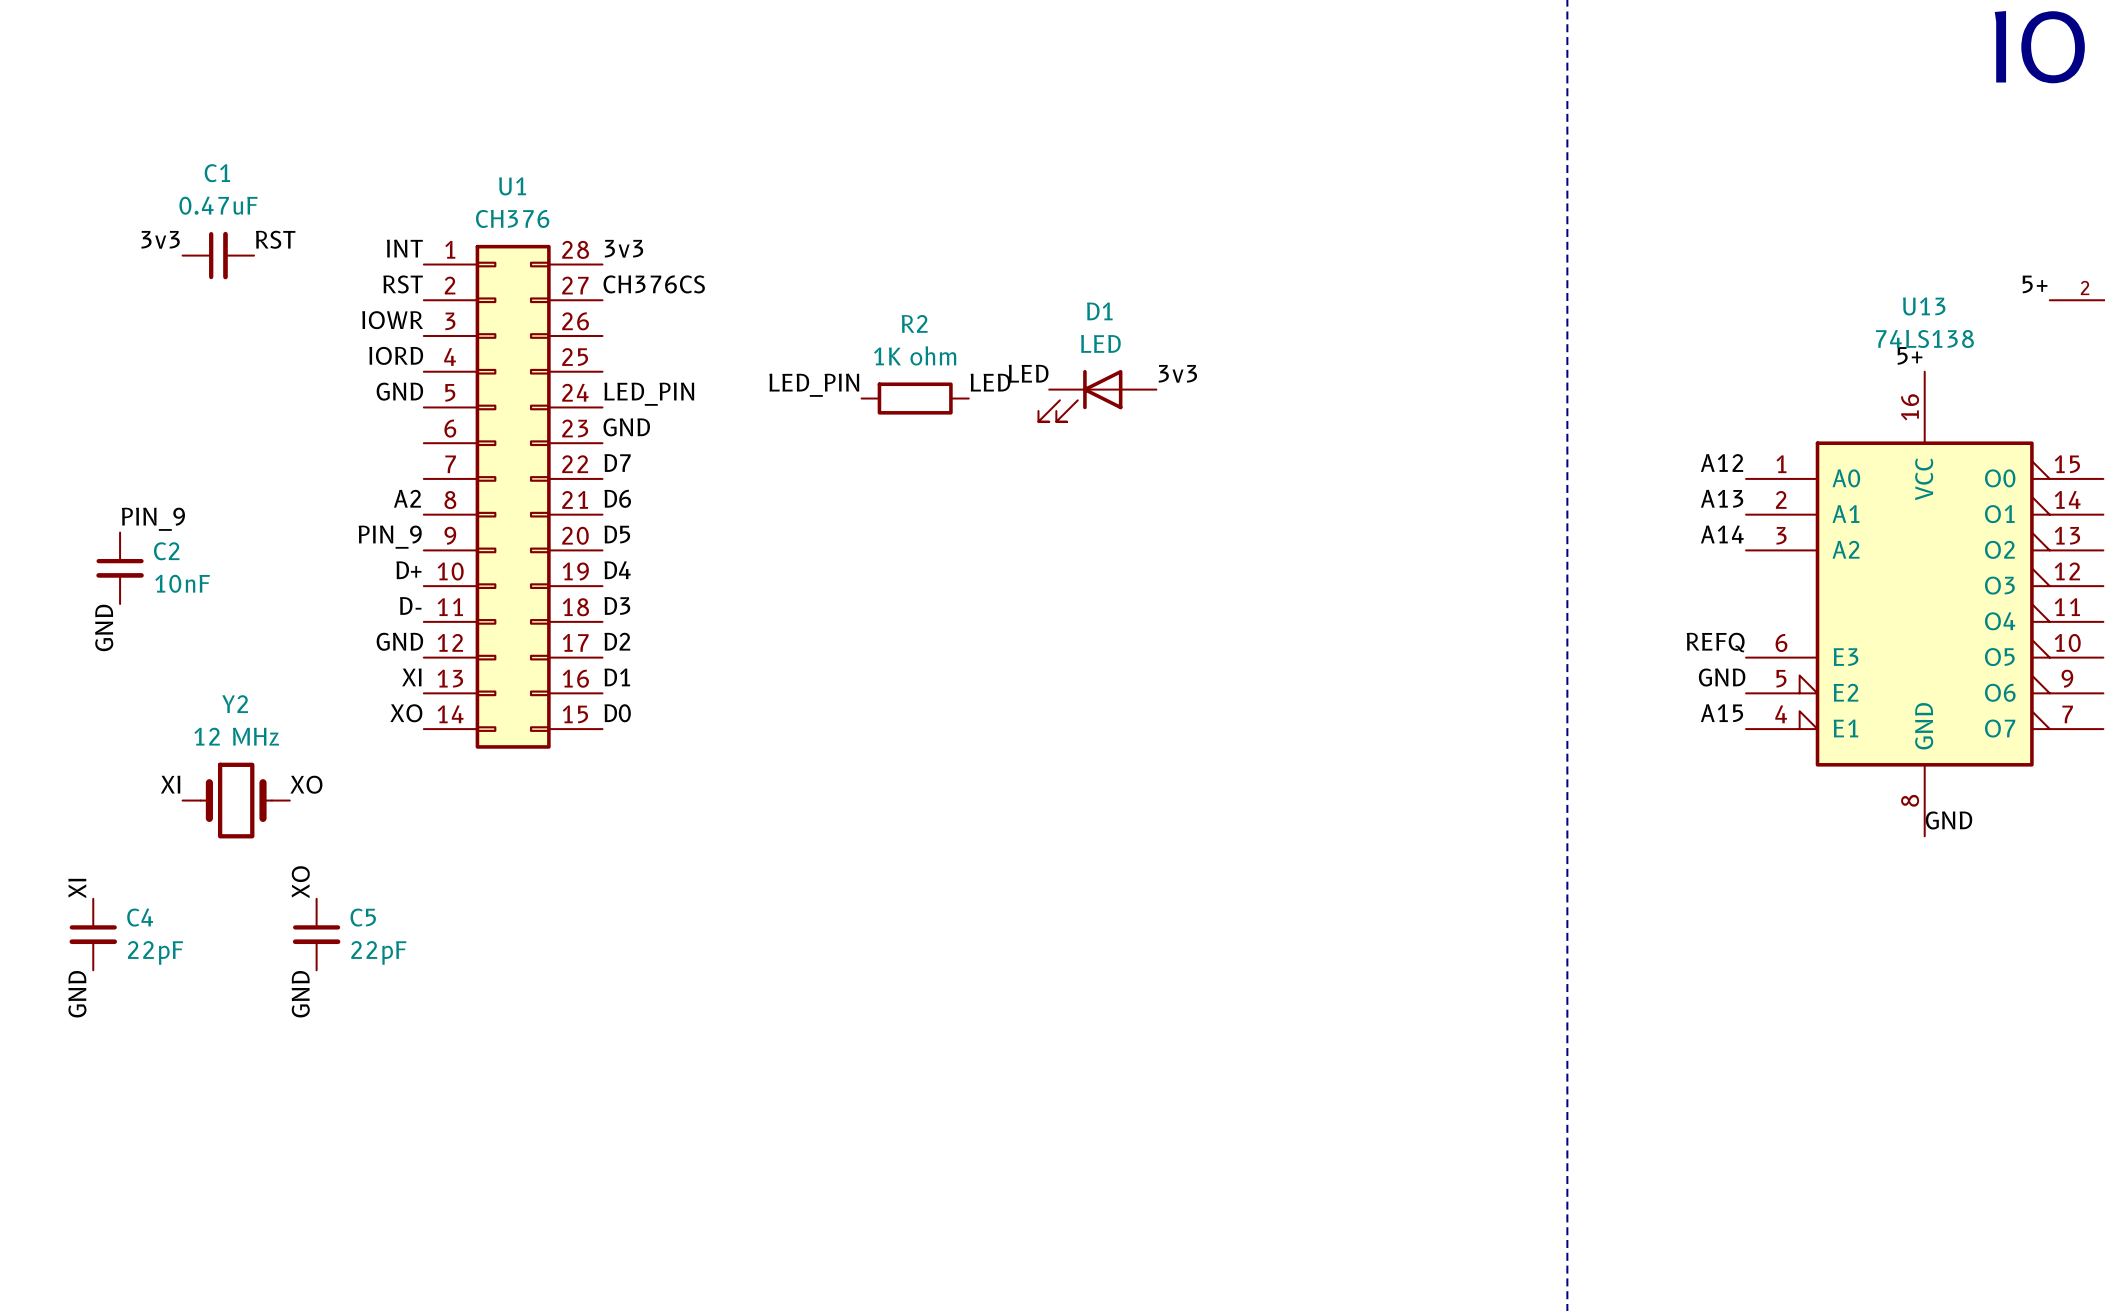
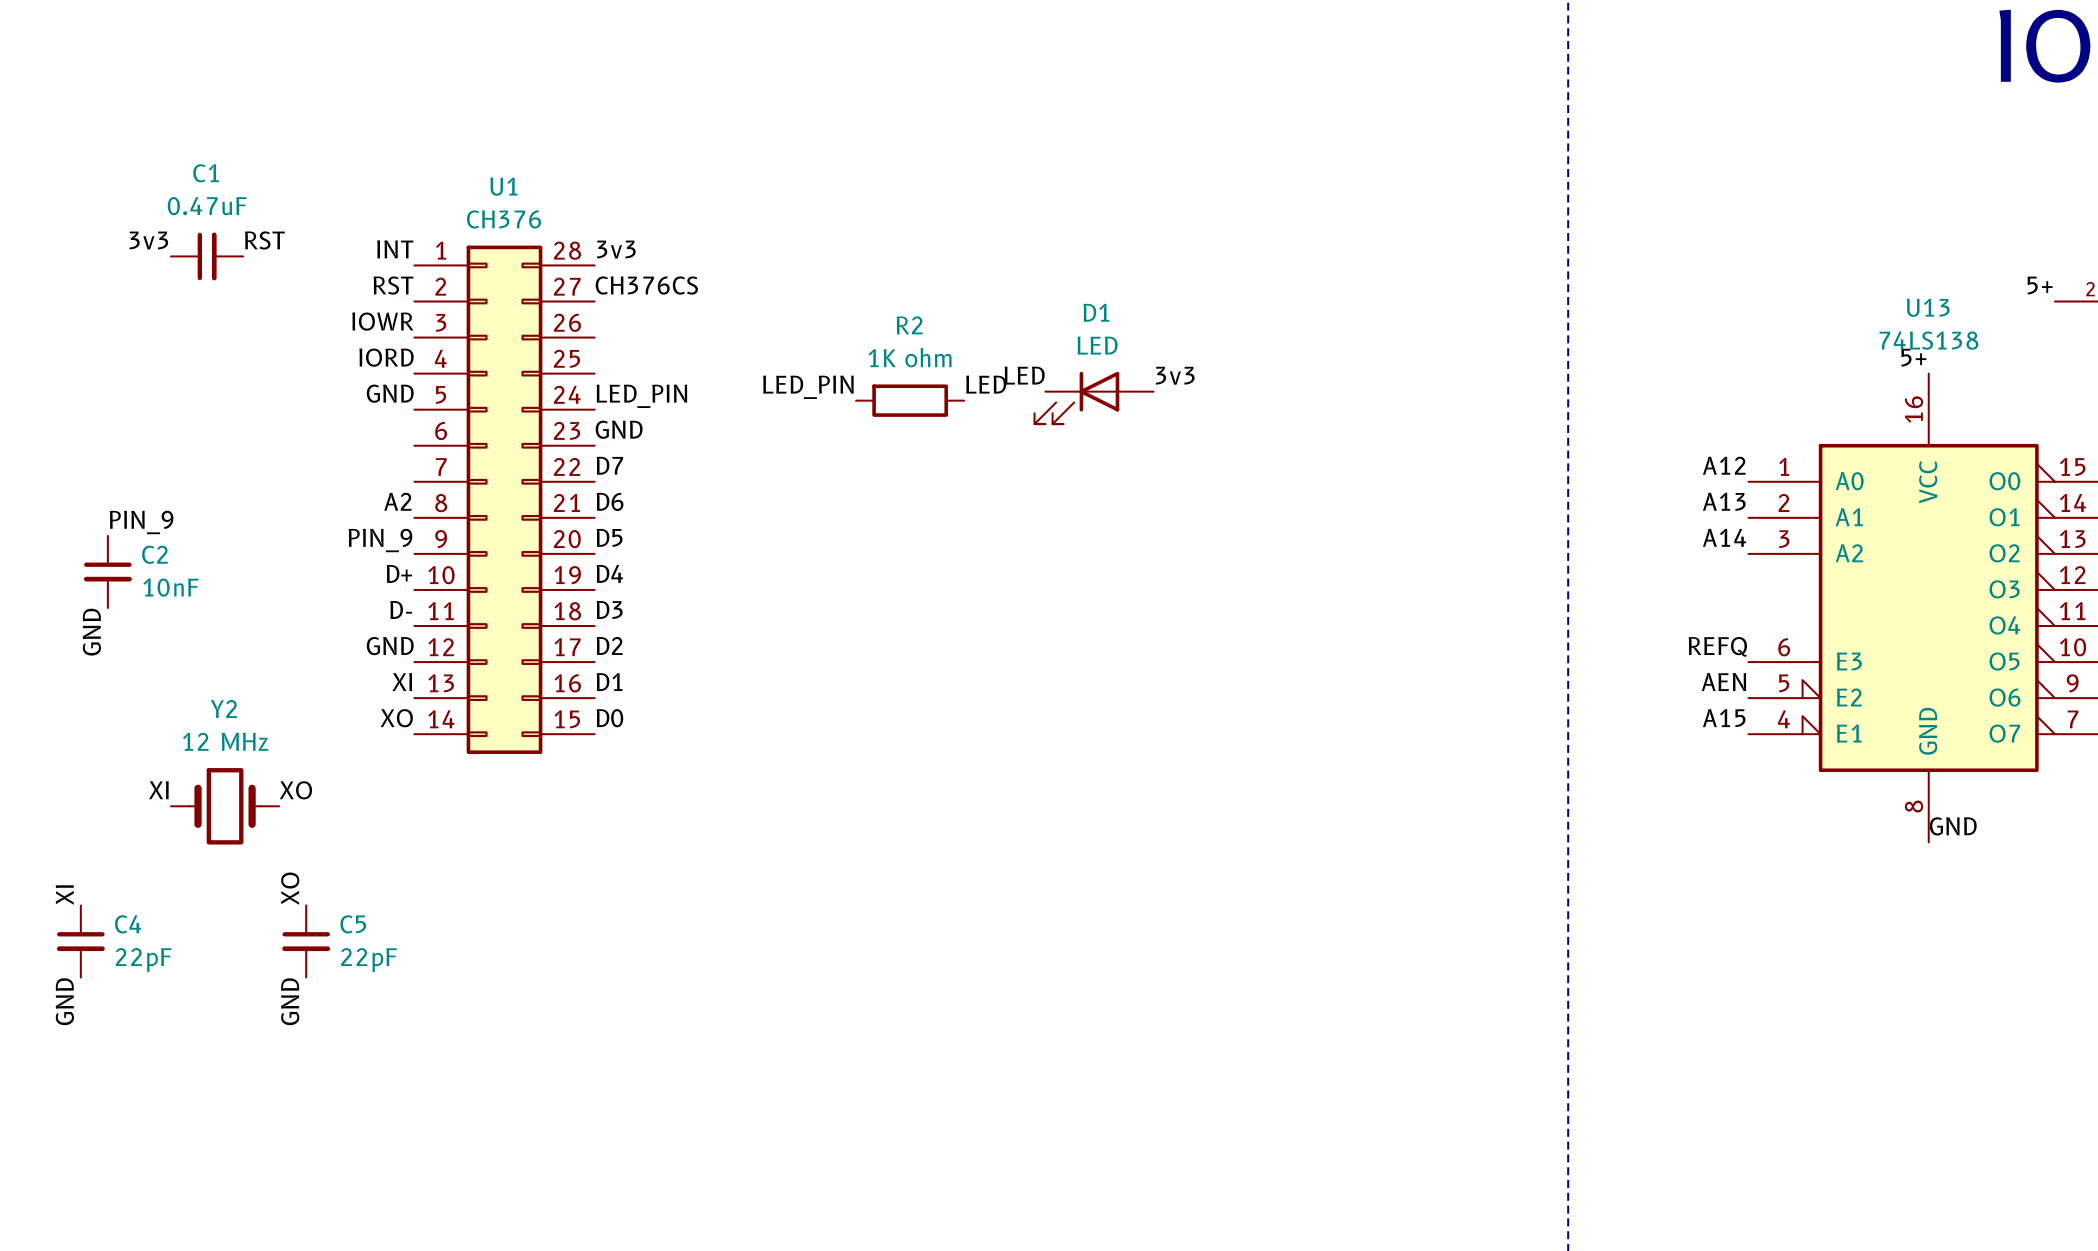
label: GND (1722, 677) -> AEN (1723, 682)

